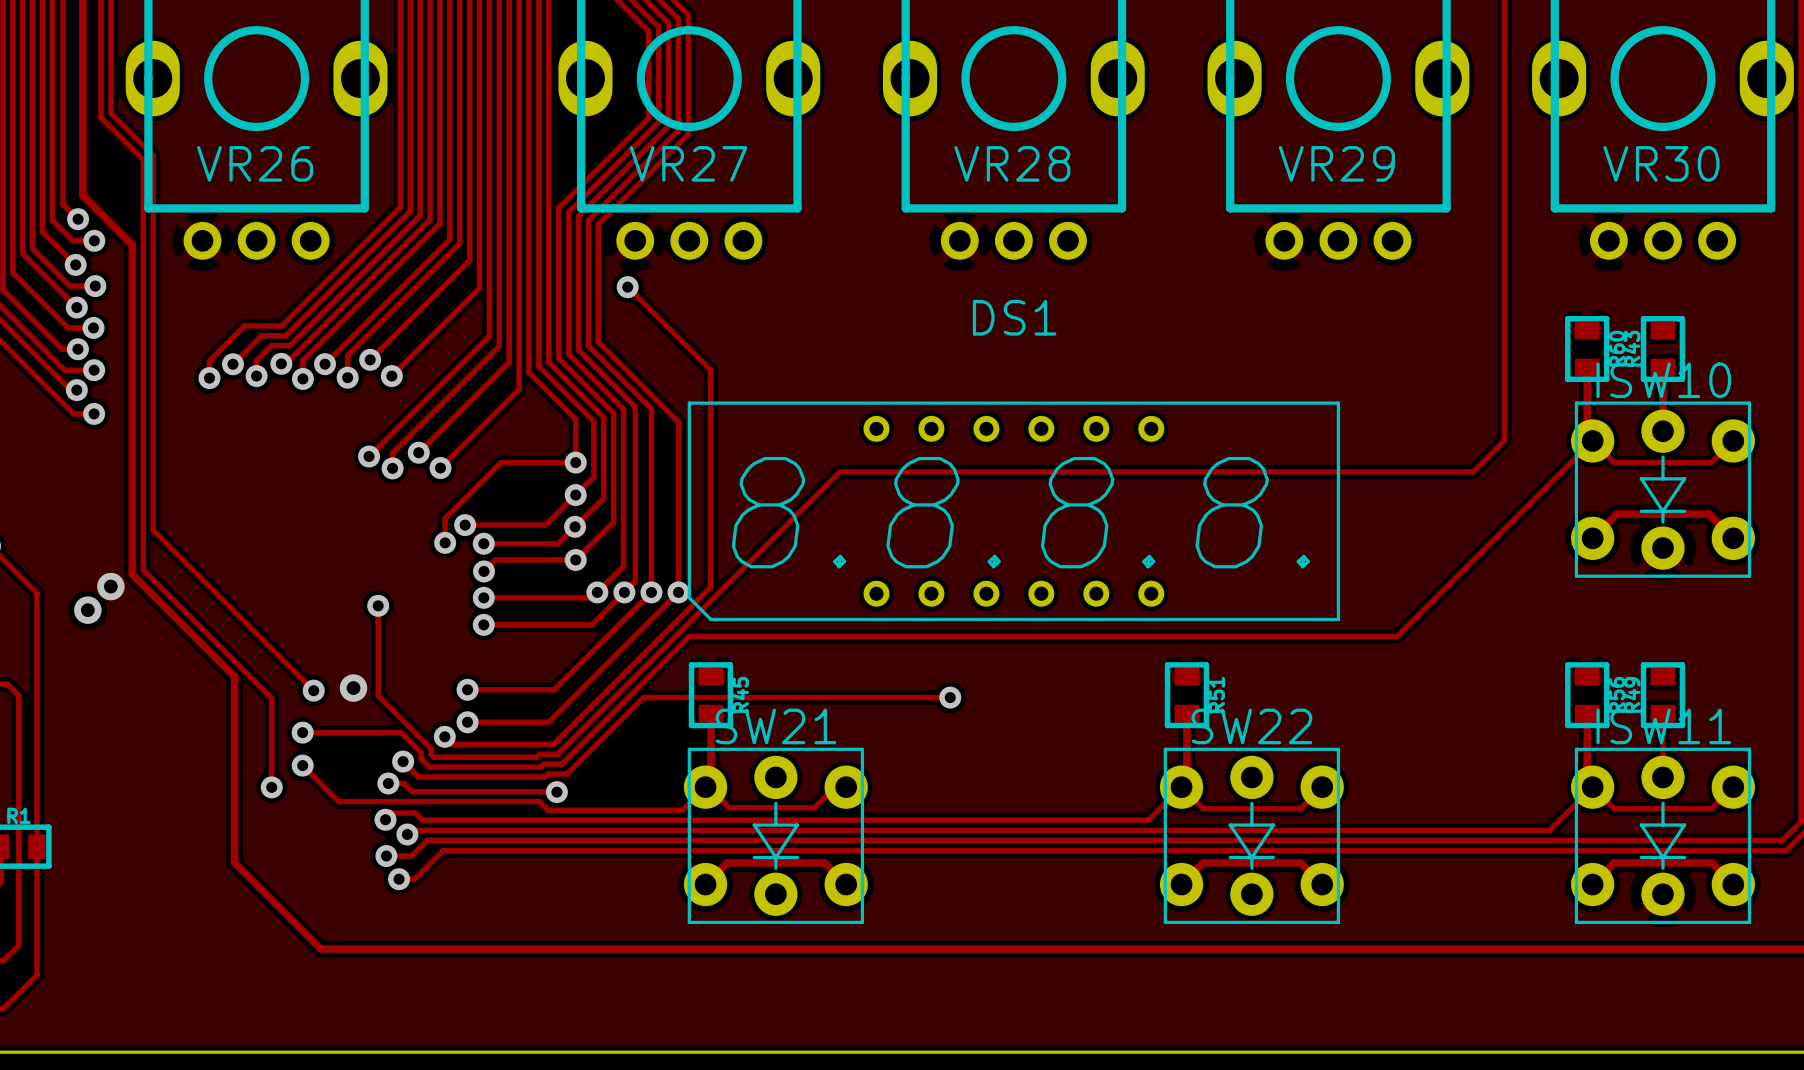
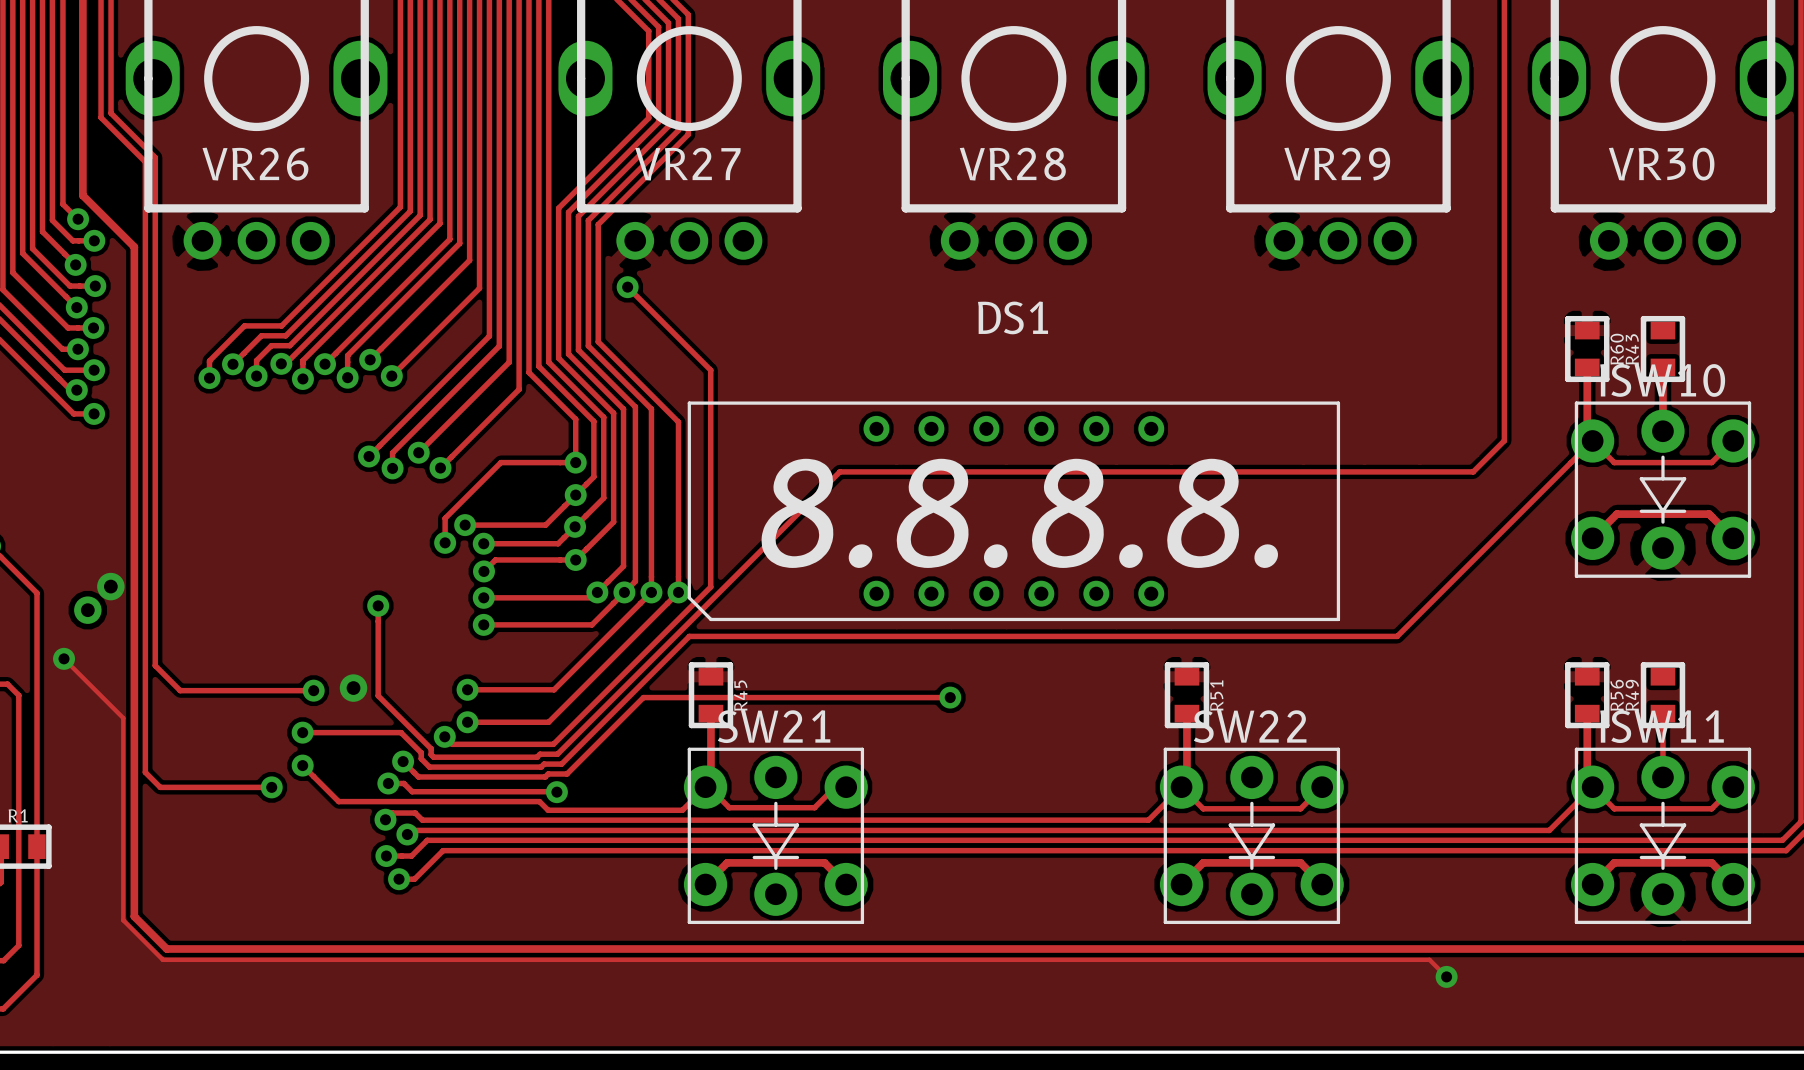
track: (153, 155) (153, 530) (313, 690) -> (153, 155) (155, 157) (155, 665) (180, 690) (313, 690)
track: (143, 159) (143, 569) (271, 698) (271, 787) -> (143, 159) (145, 161) (145, 772) (160, 787) (271, 787)
track: (132, 244) (132, 574) (234, 676) (234, 862) (320, 949) -> (132, 244) (134, 246) (134, 916) (166, 949) (320, 949)
track: none -> (64, 658) (123, 718) (123, 920) (162, 959) (1429, 959) (1446, 976)
via: none -> (64, 658)
via: none -> (1446, 976)

